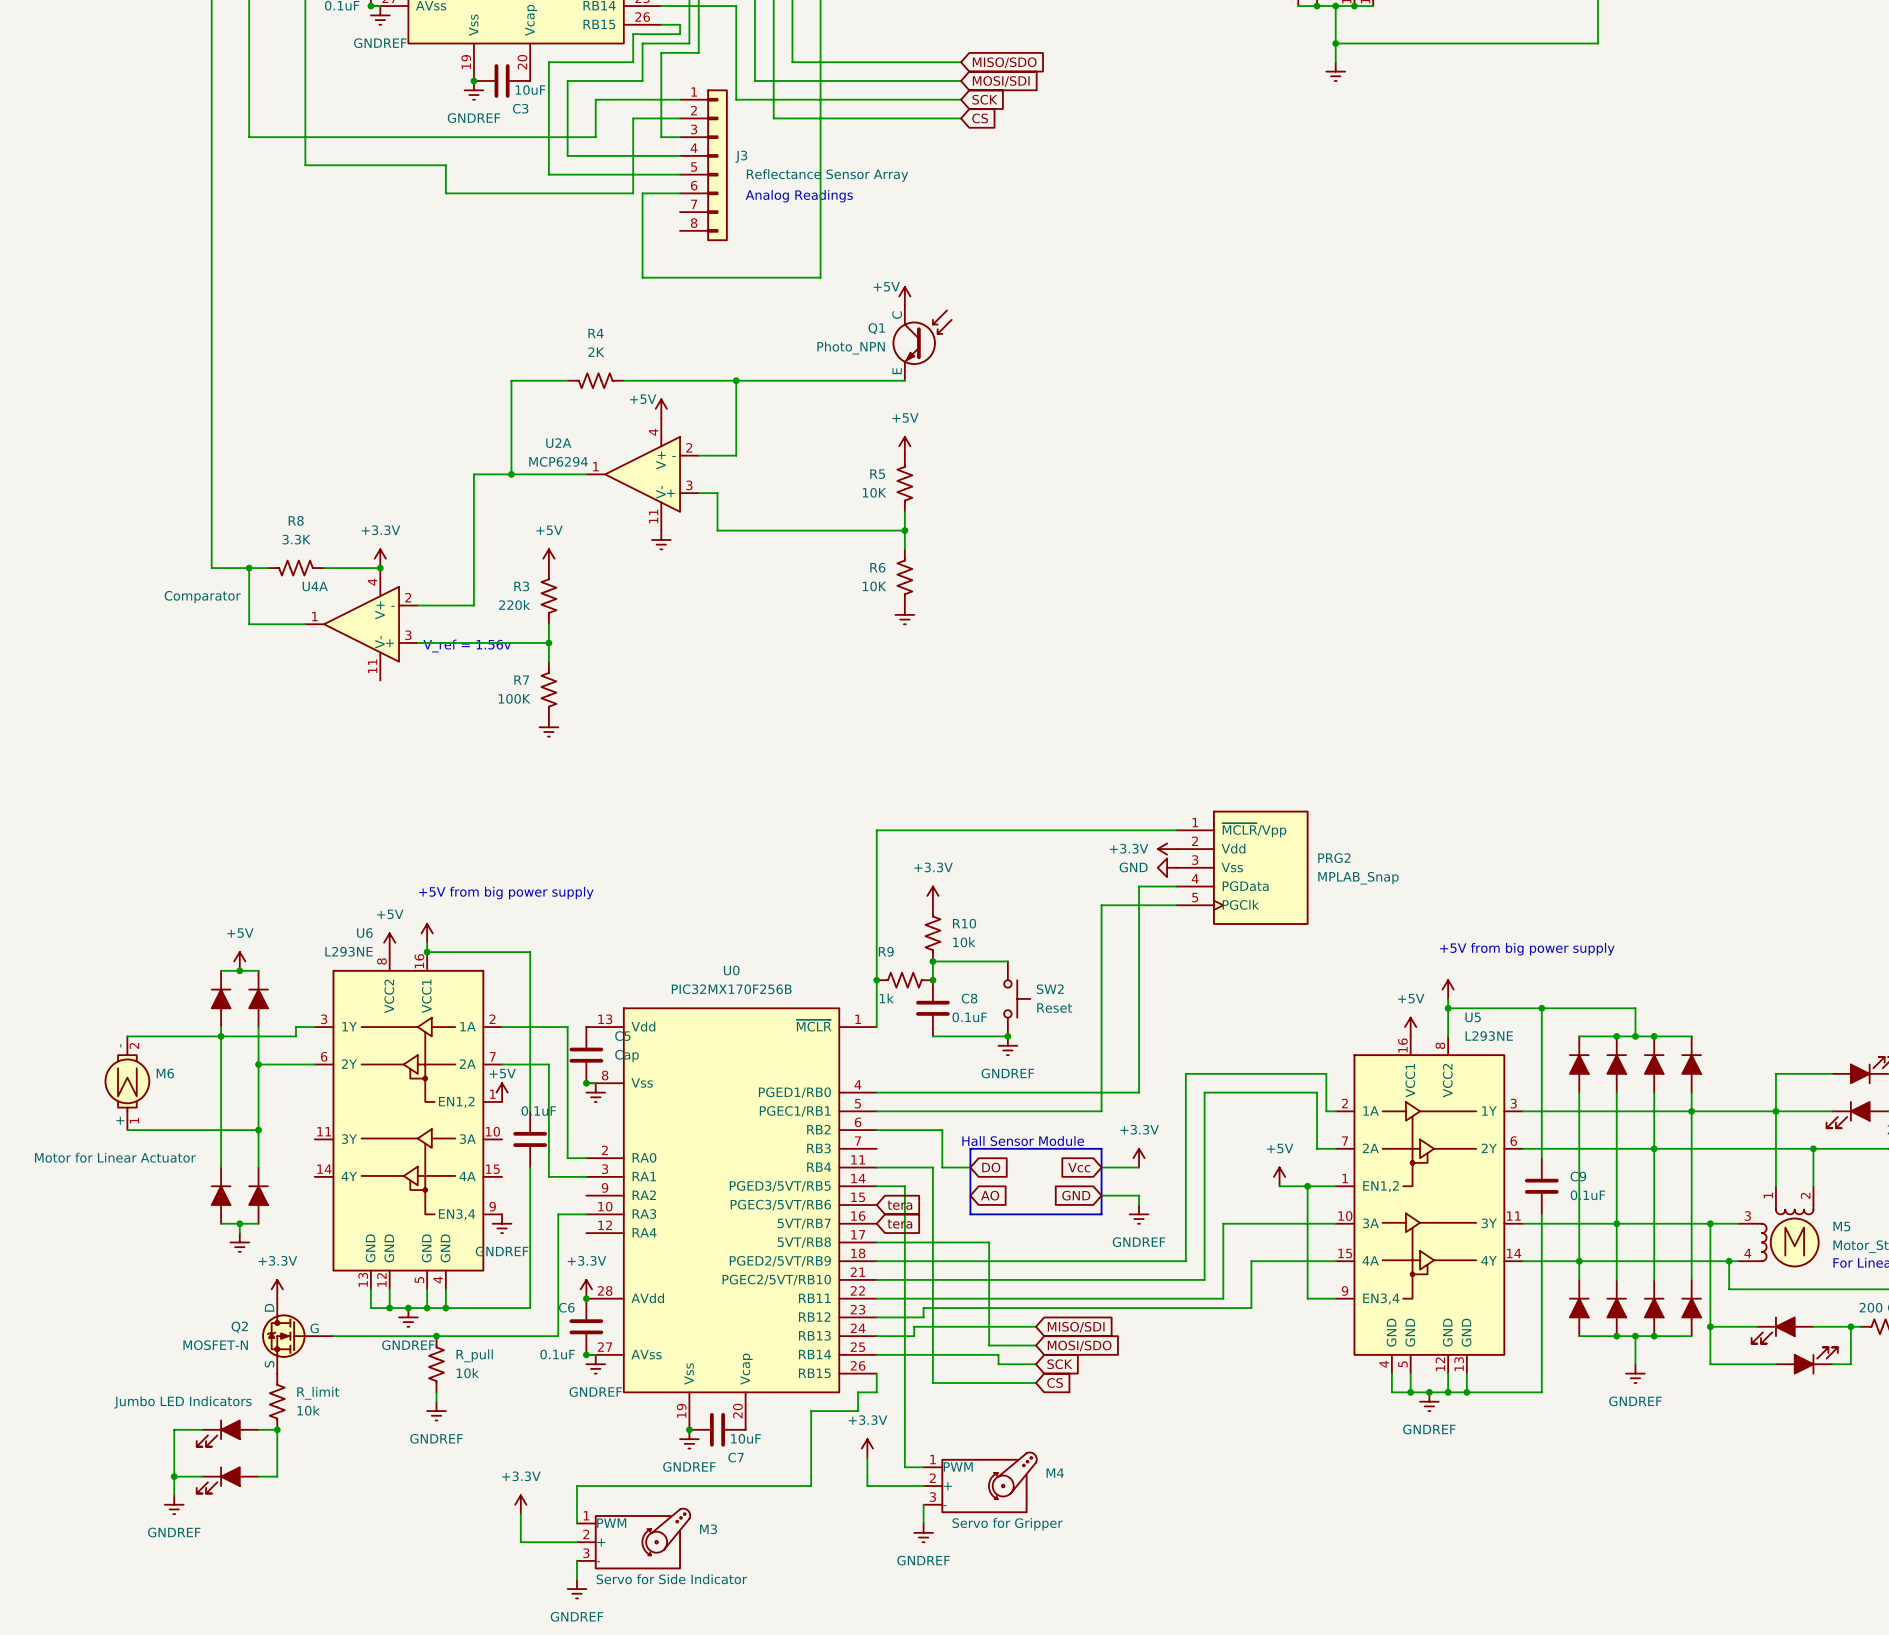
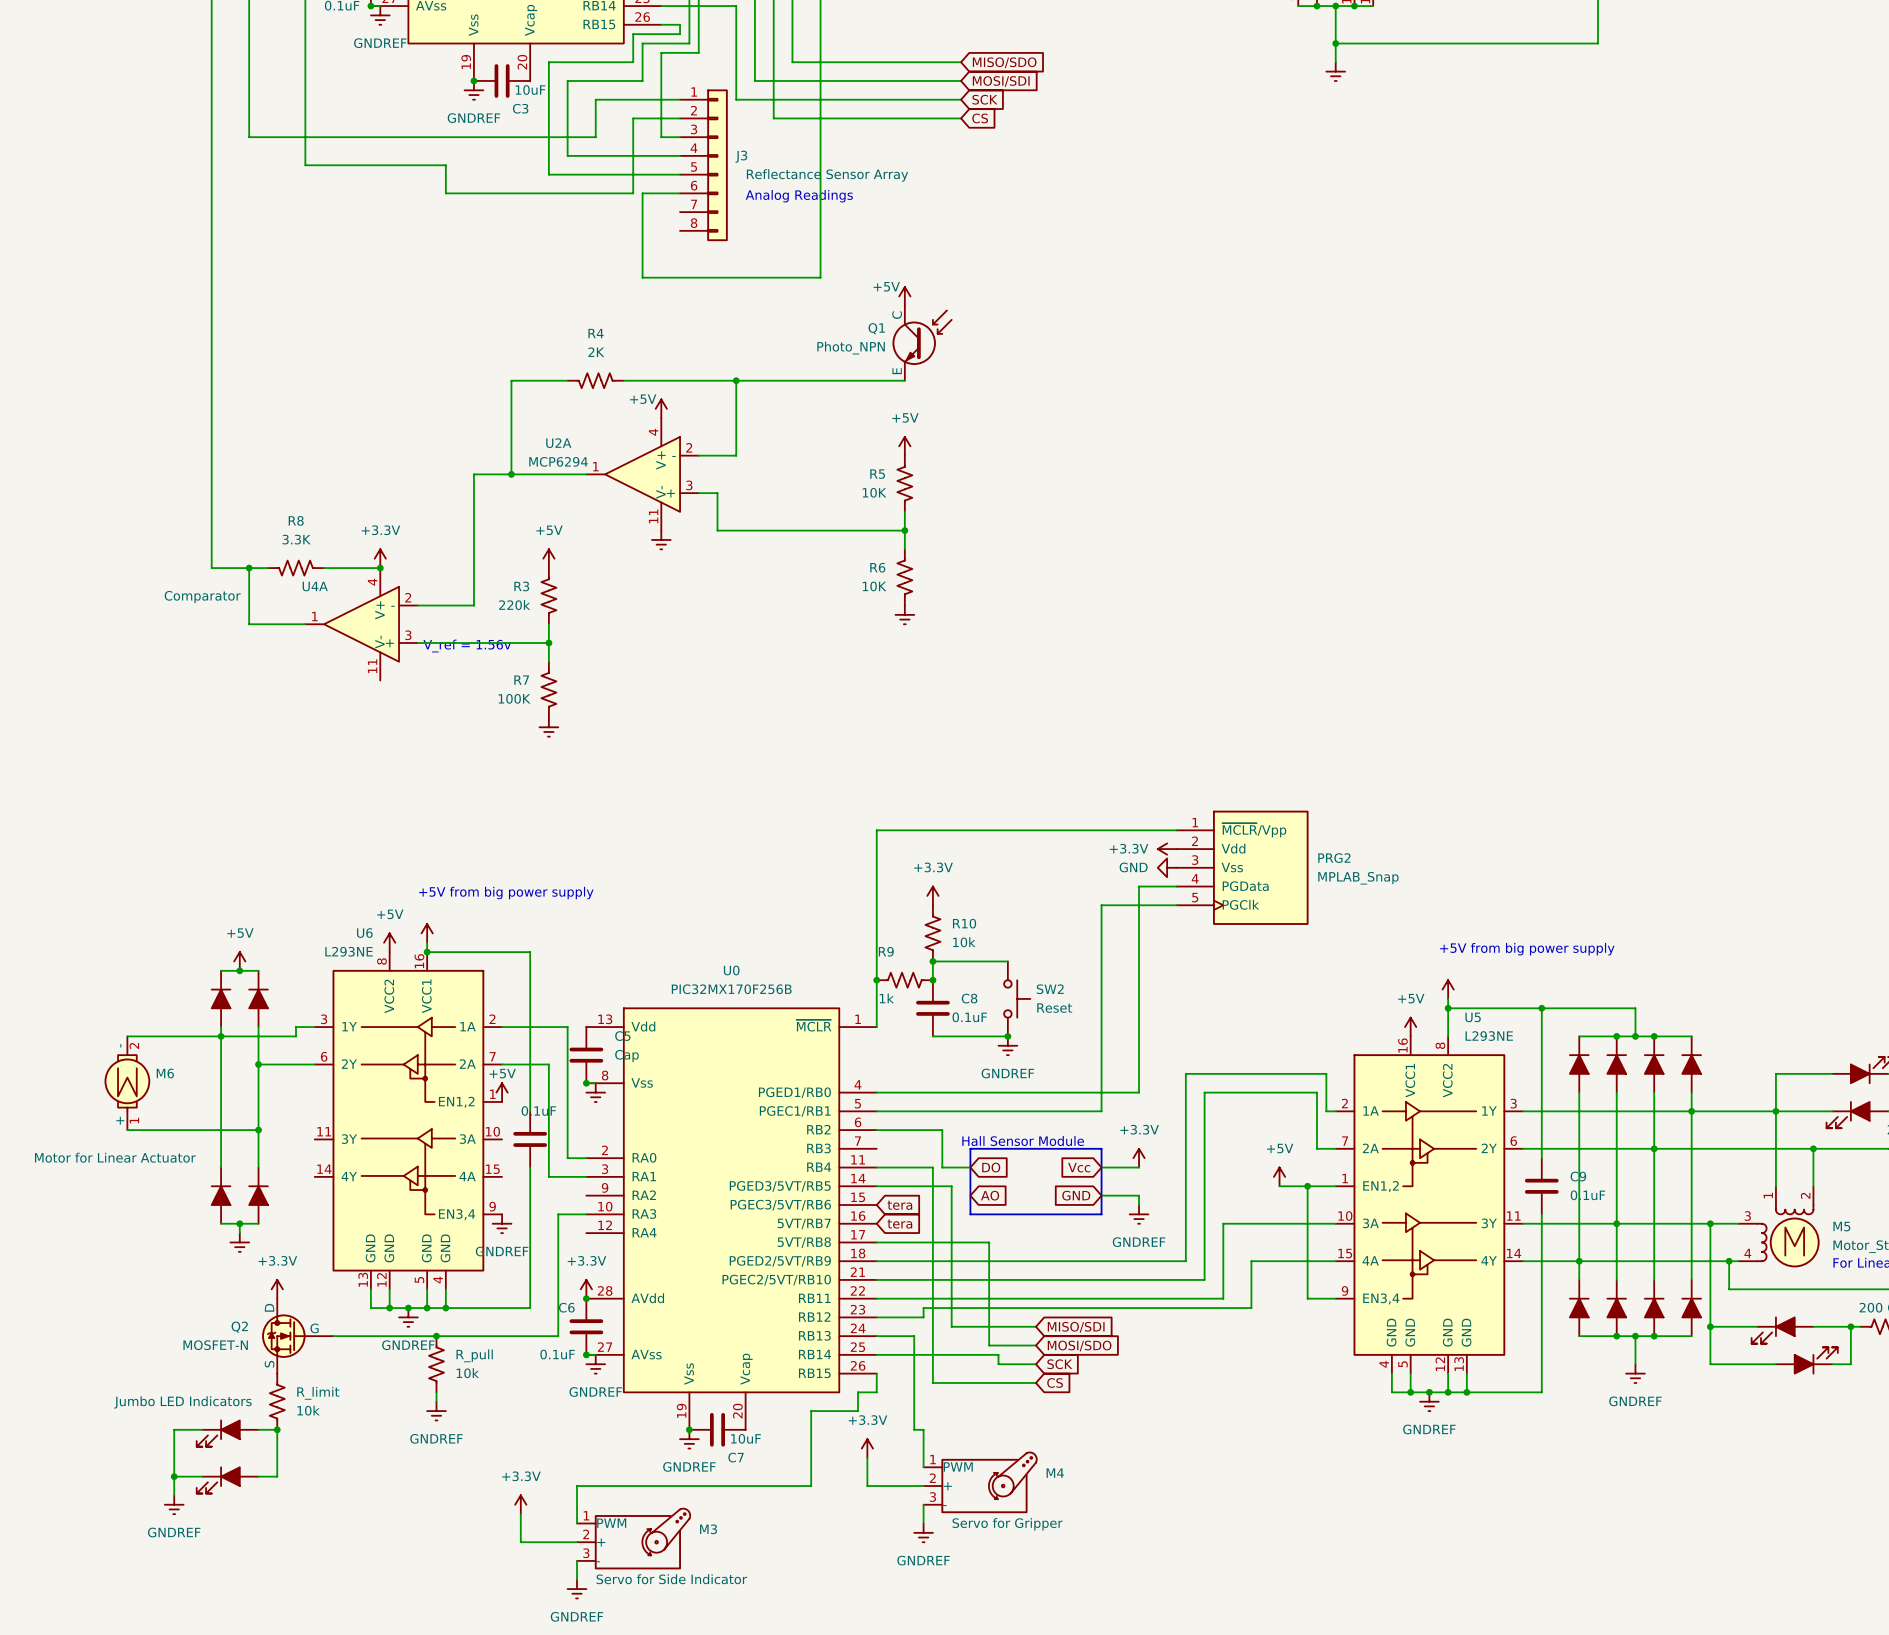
wire: (904, 1186) (904, 1467) (923, 1467) -> (904, 1186) (951, 1186) (951, 1326)
wire: (951, 1326) (914, 1326) (914, 1336) -> (923, 1467) (923, 1429) (914, 1429) (914, 1336)

